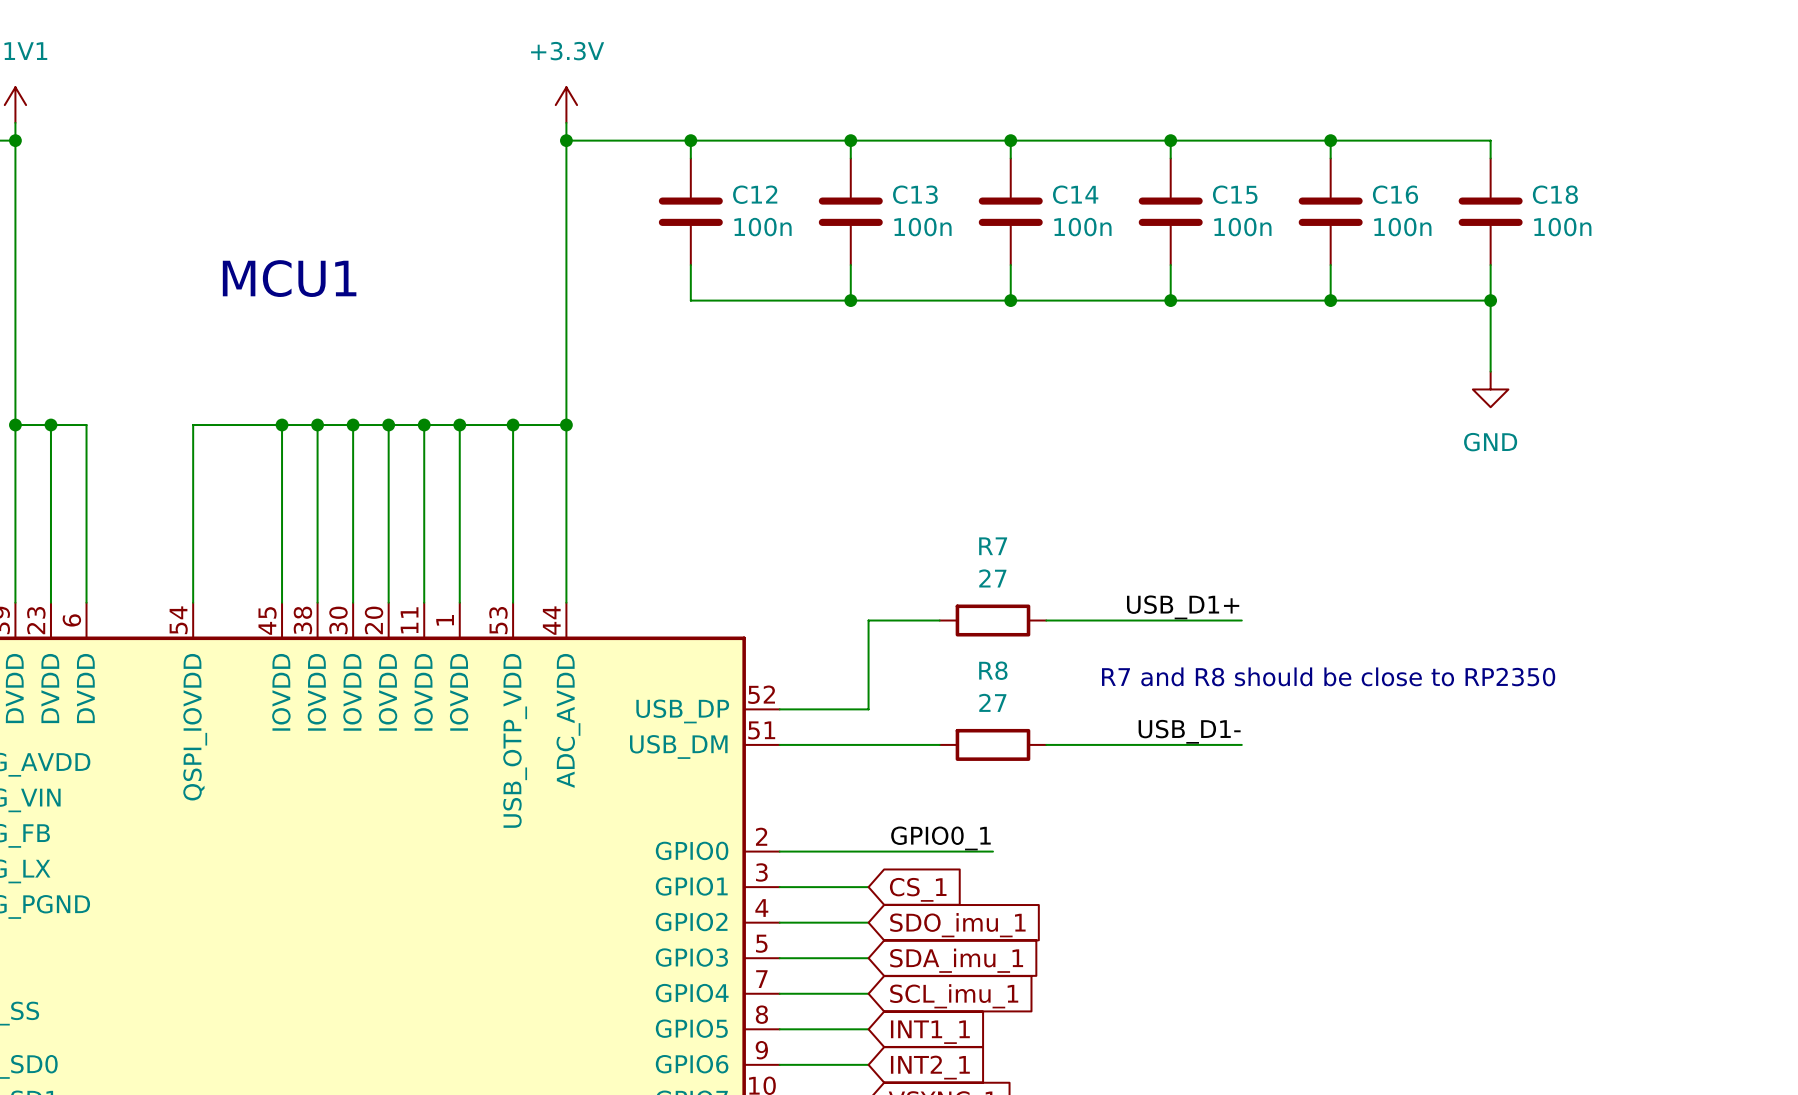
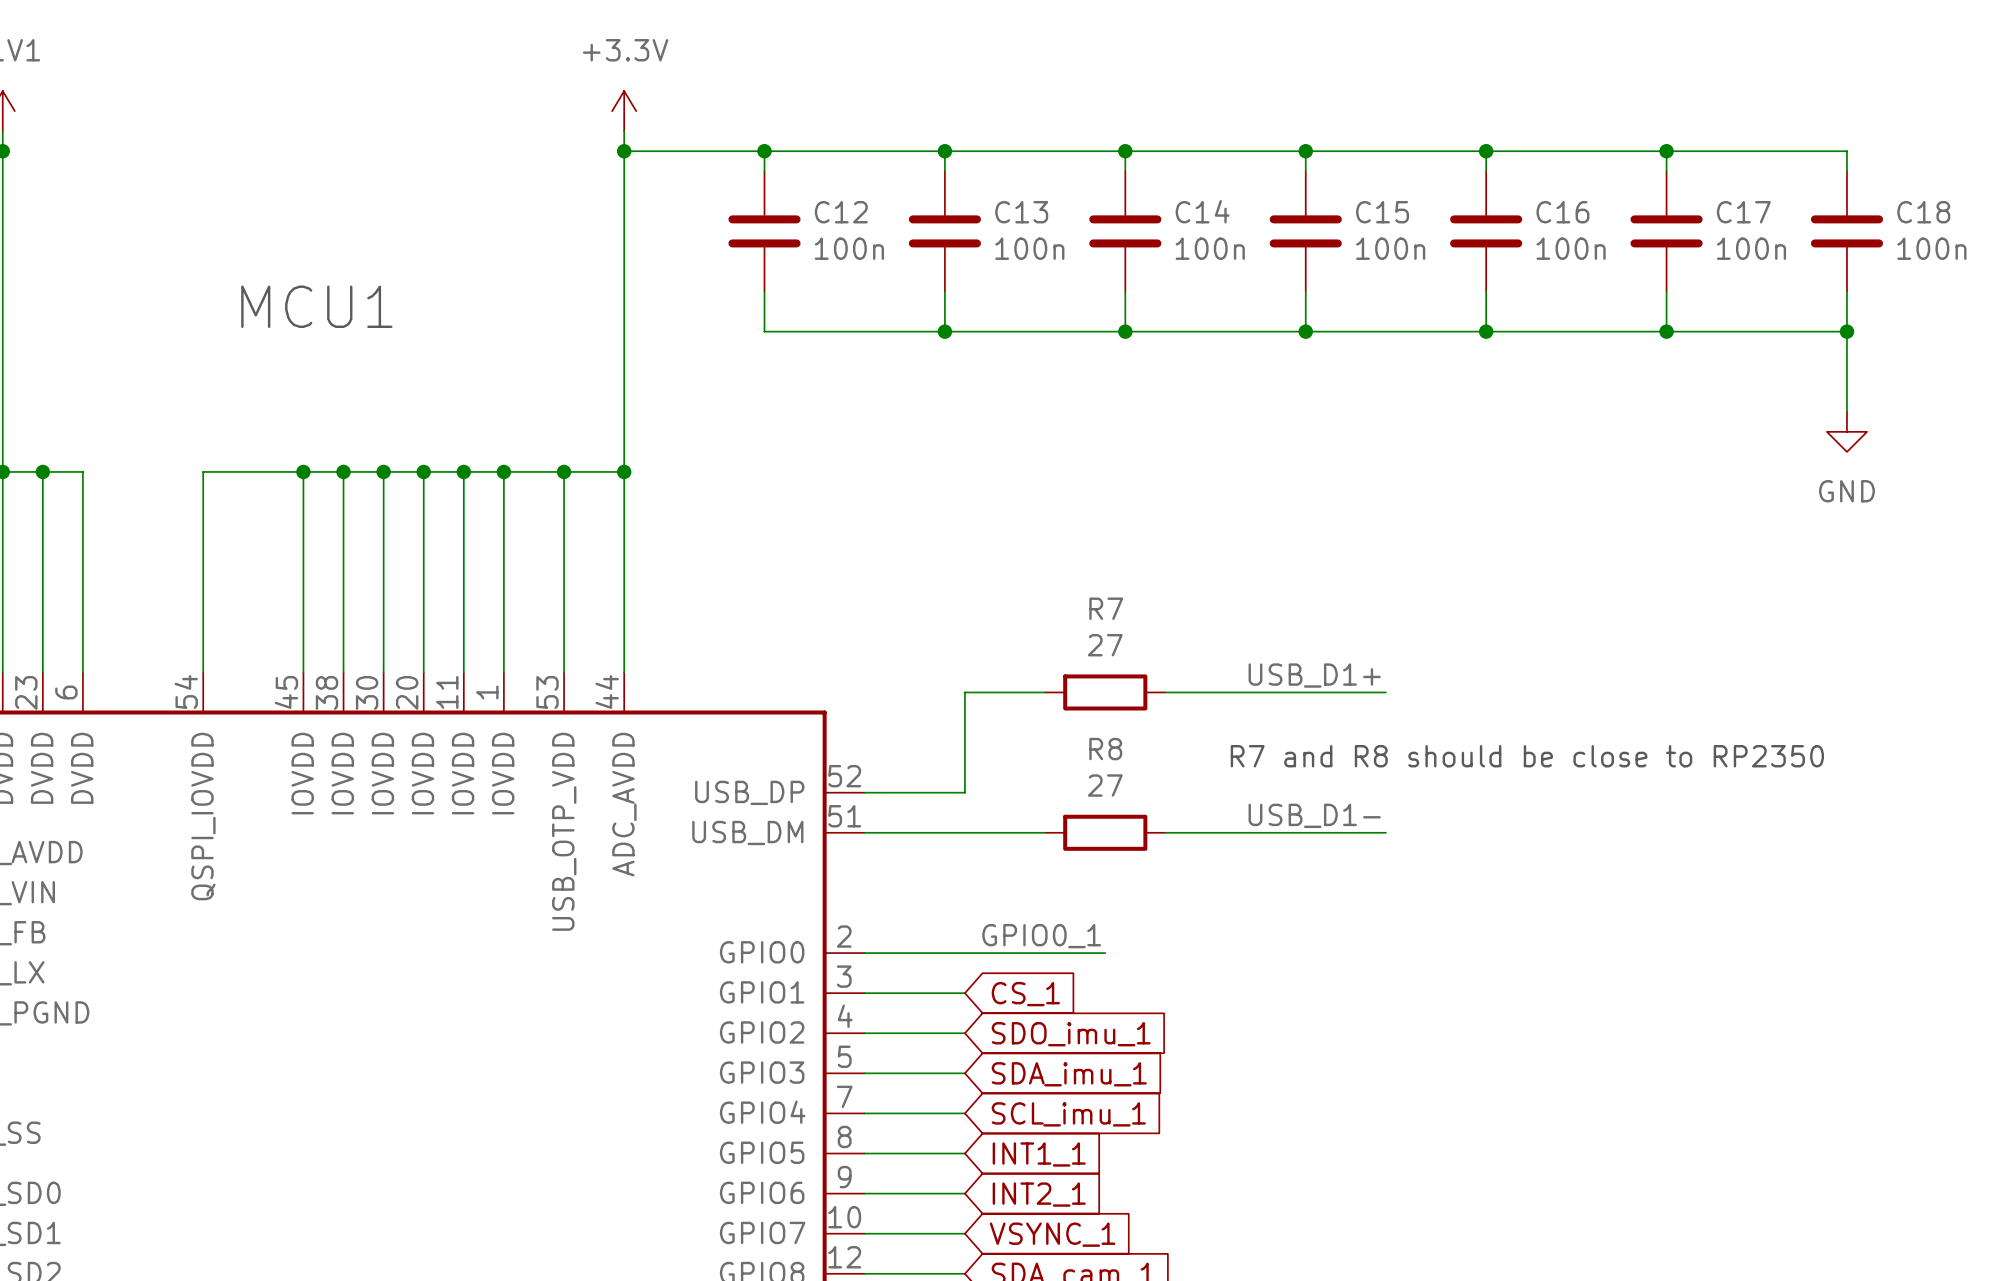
wire: none -> (1666, 151) (1846, 151) (1846, 171)
junction: none -> (1666, 151)
C18 name: C18 (1555, 194) -> C17 (1743, 212)
C18: none -> 100n (1846, 231)
wire: none -> (1846, 291) (1846, 411)
wire: (1490, 300) (1490, 371) -> (1666, 331) (1846, 331)
junction: none -> (1846, 331)
power symbol position: GND (1490, 389) -> GND (1846, 431)

